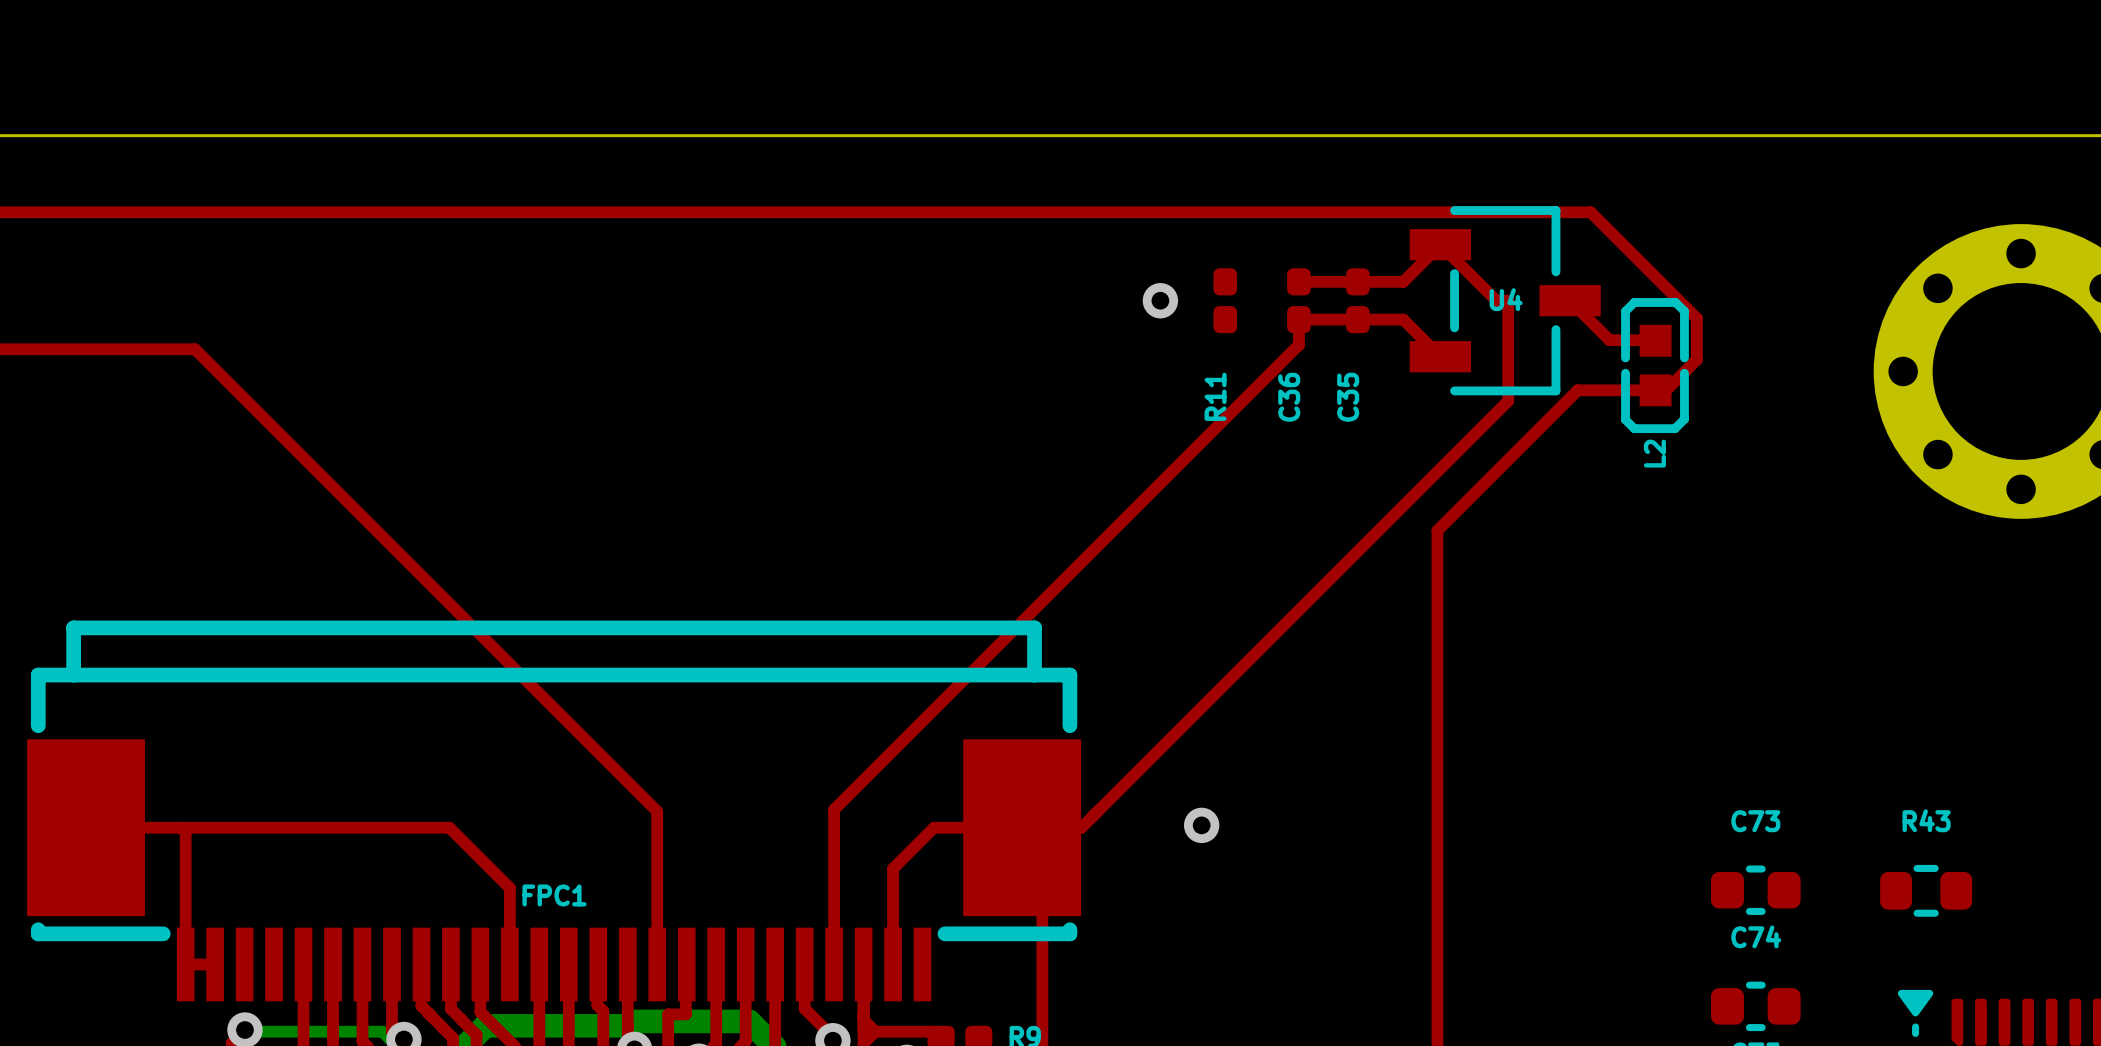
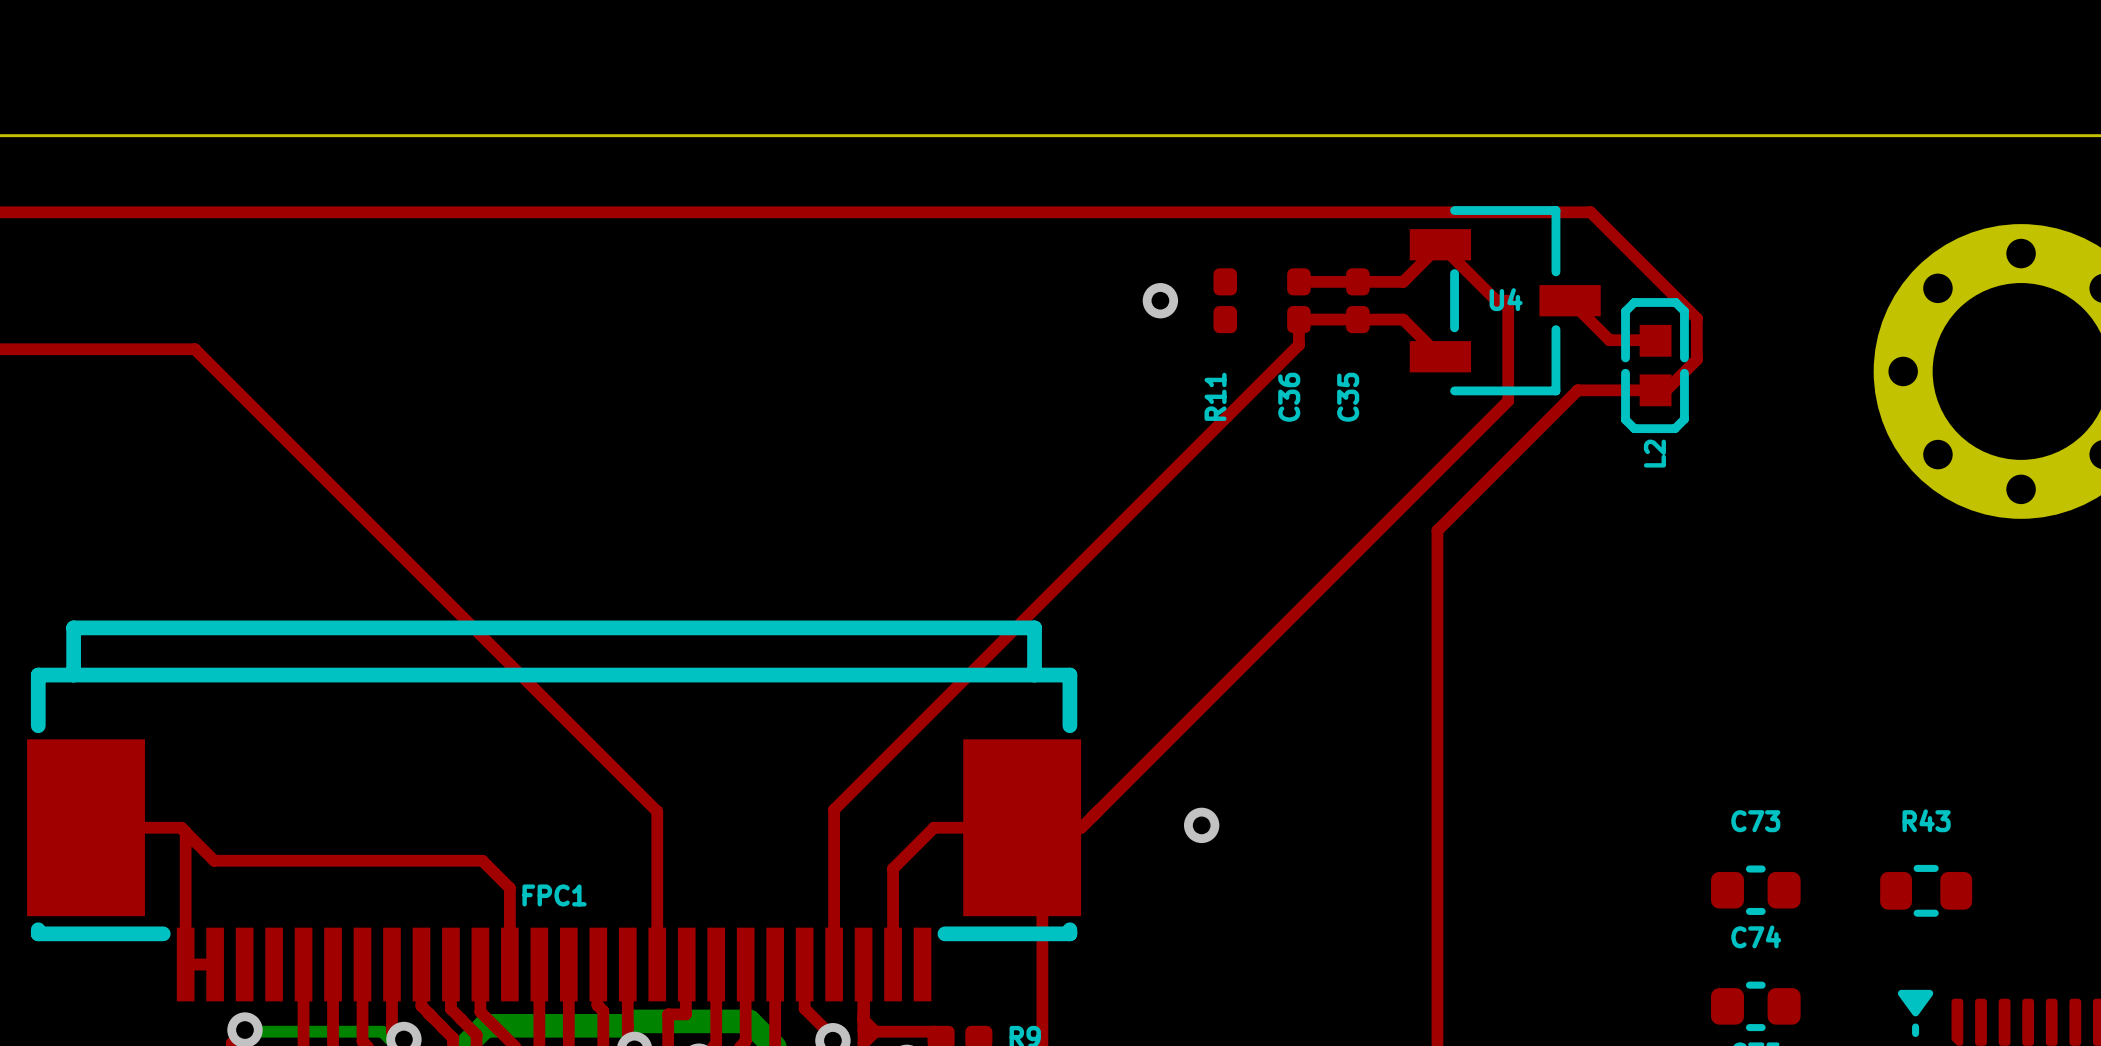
top track: (181, 827) (449, 827) (482, 860) -> (185, 832) (214, 860) (482, 860)

